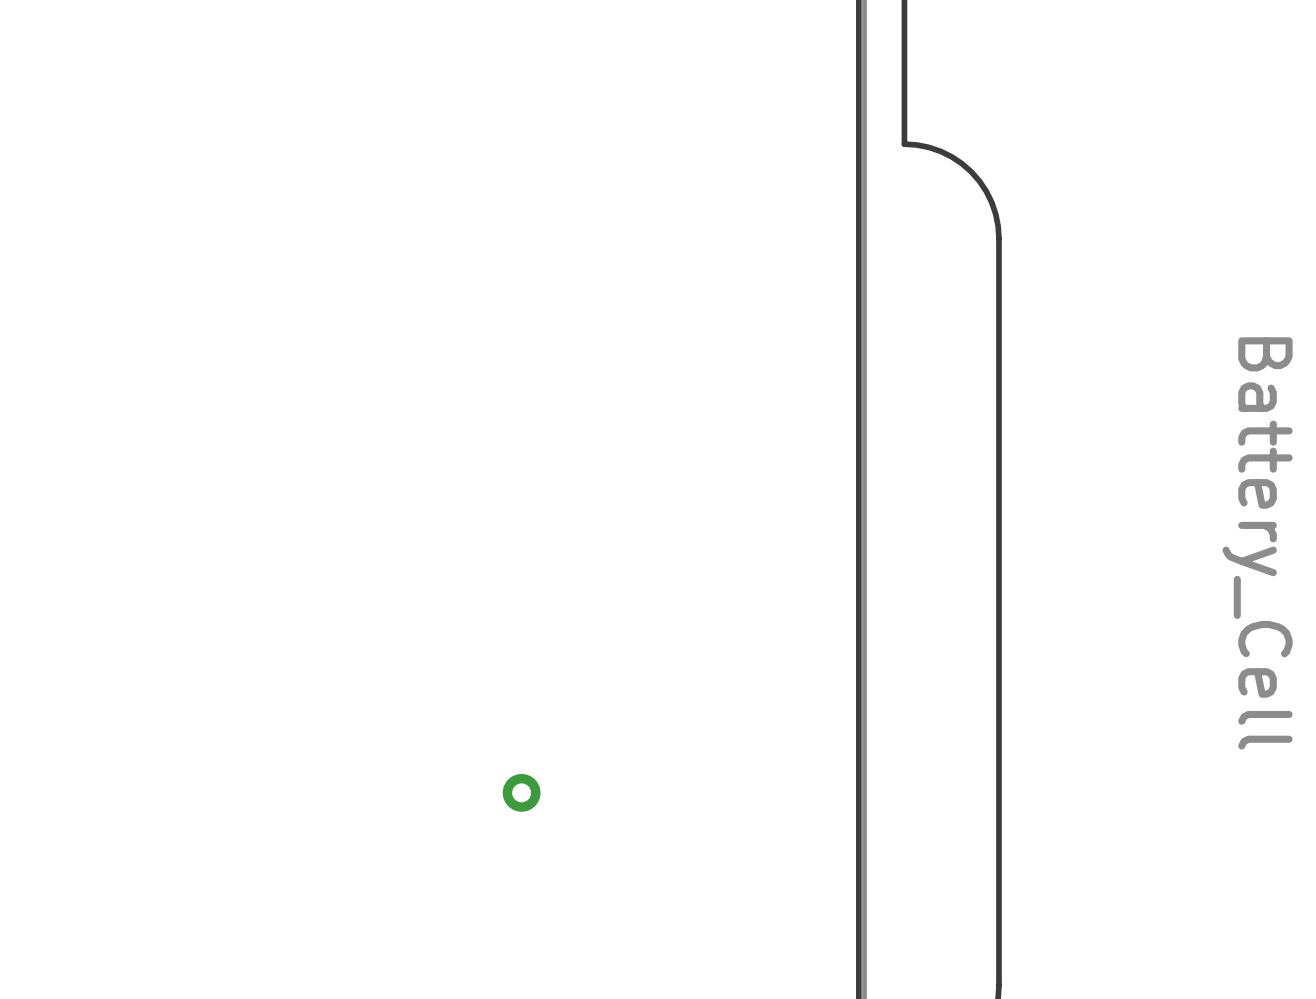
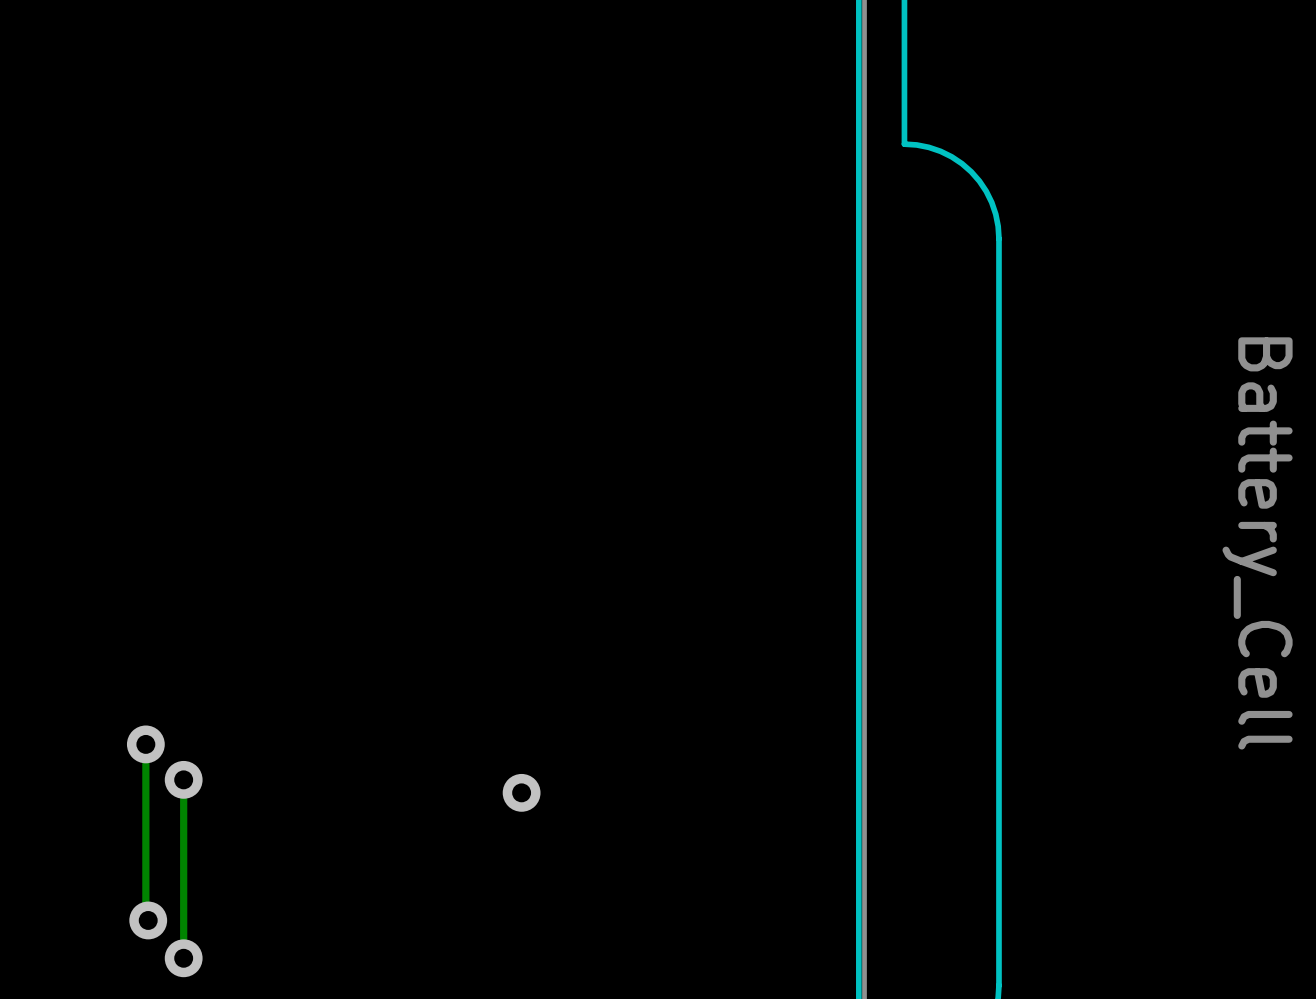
track: none -> (145, 744) (145, 918) (148, 920)
via: none -> (145, 744)
track: none -> (183, 779) (183, 958)
via: none -> (183, 779)
via: none -> (148, 920)
via: none -> (183, 958)

